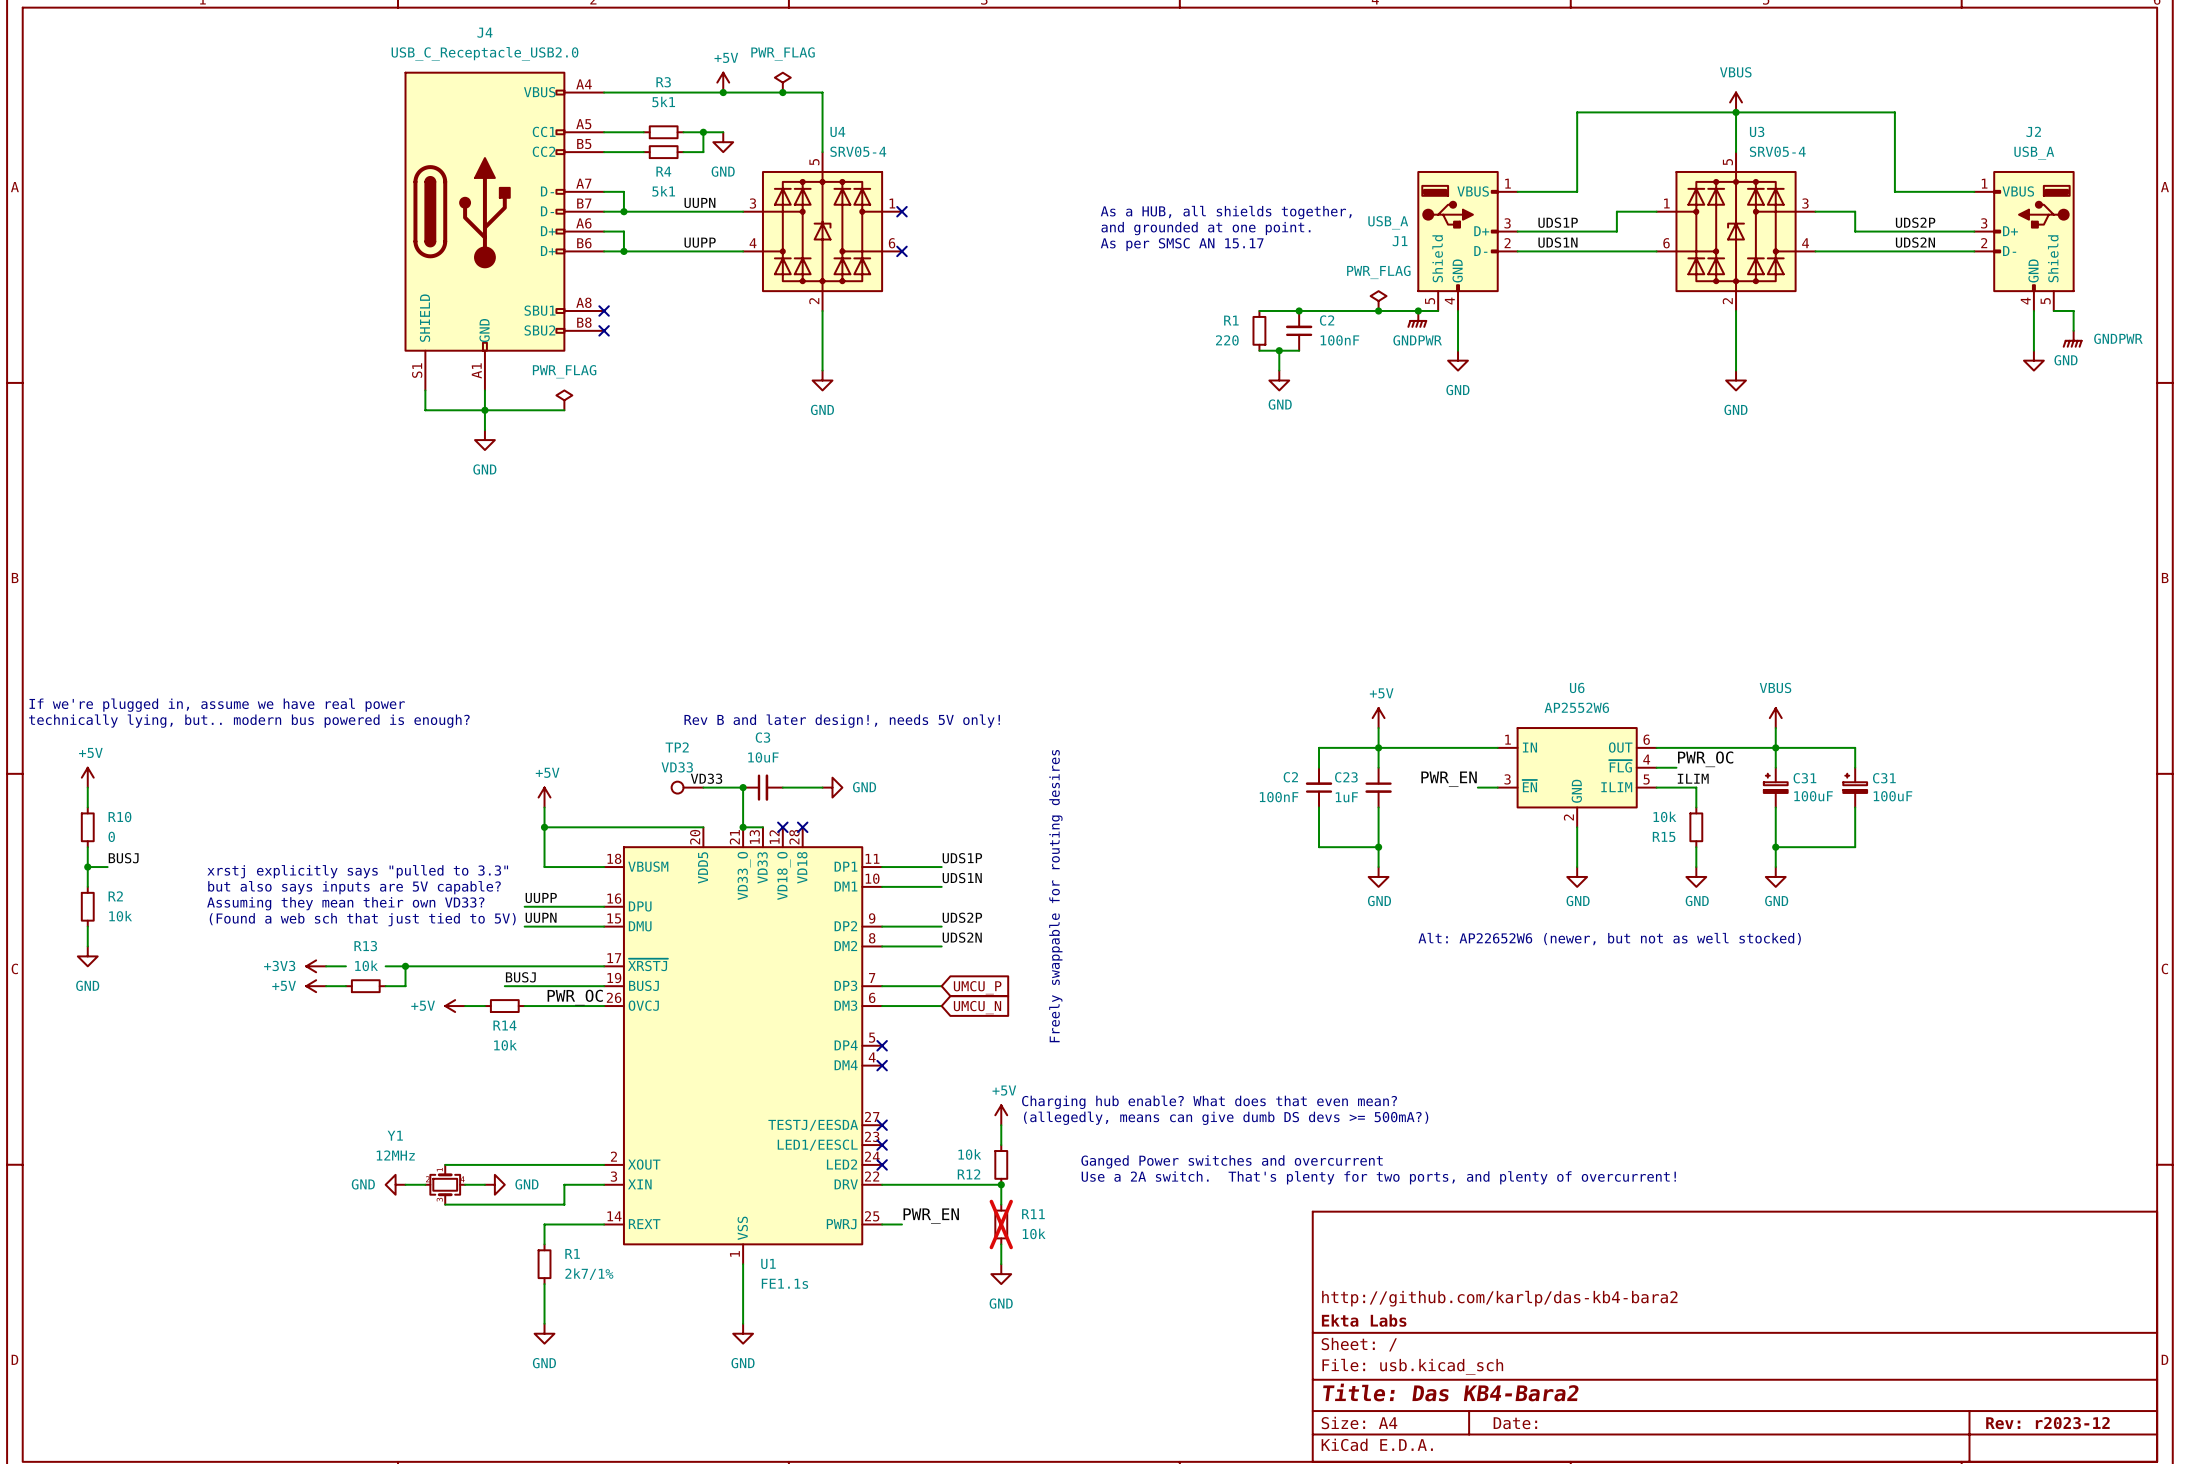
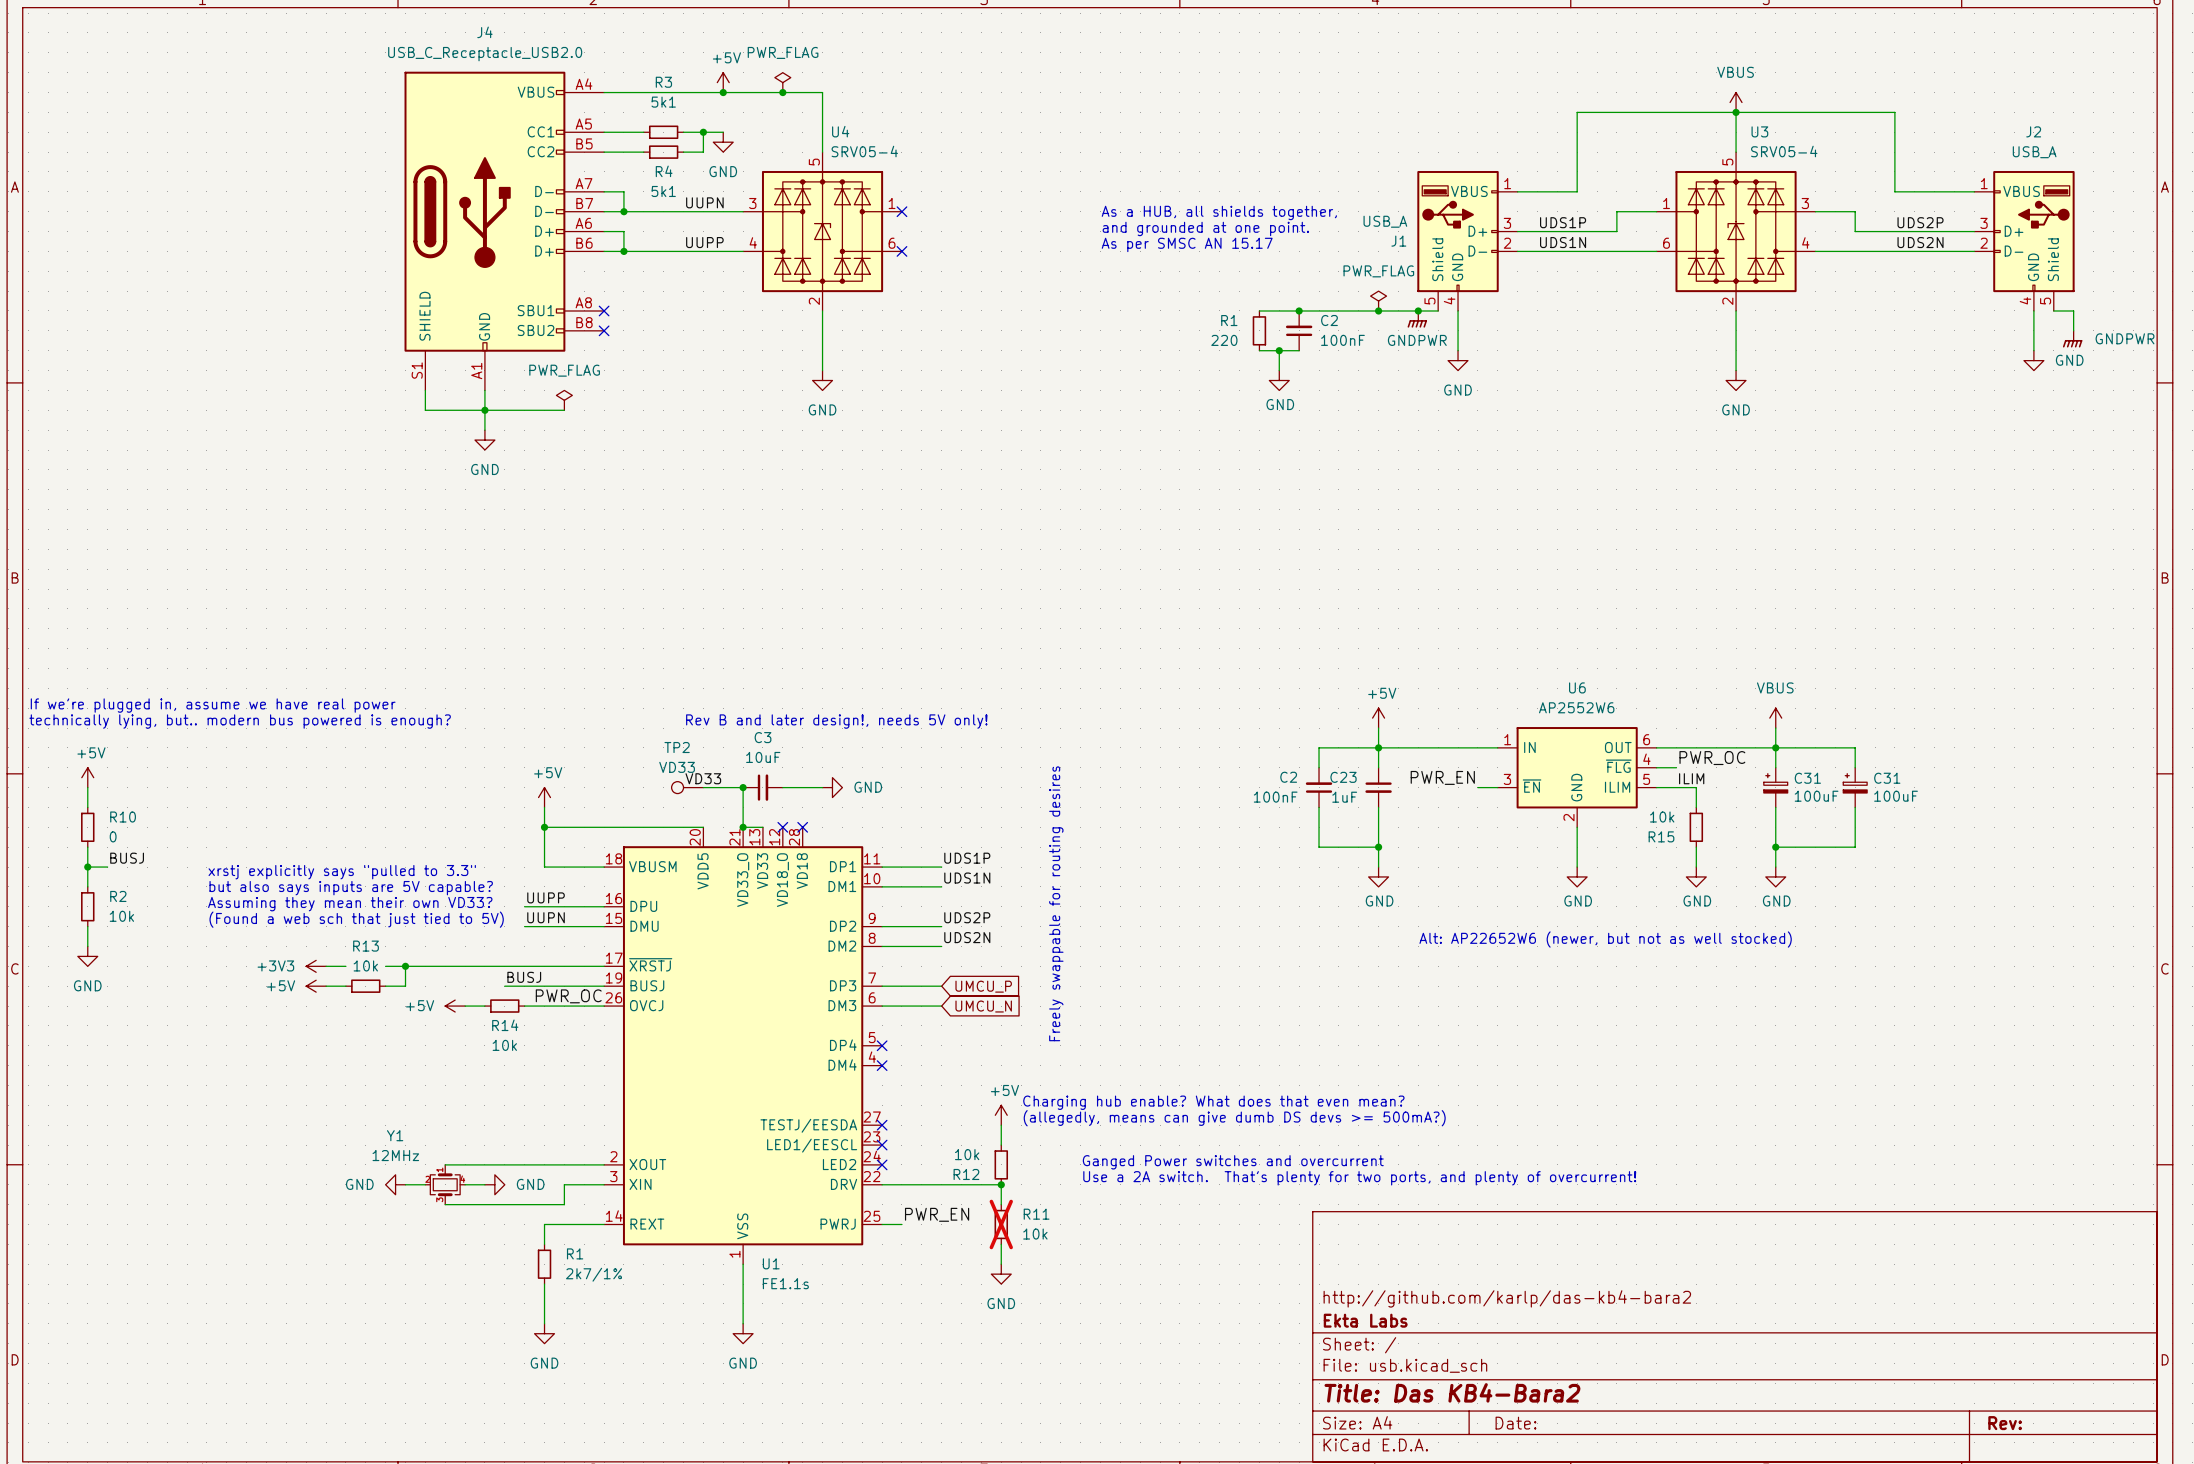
title block: Rev: r2023-12 (2047, 1423) -> Rev: (2005, 1423)

